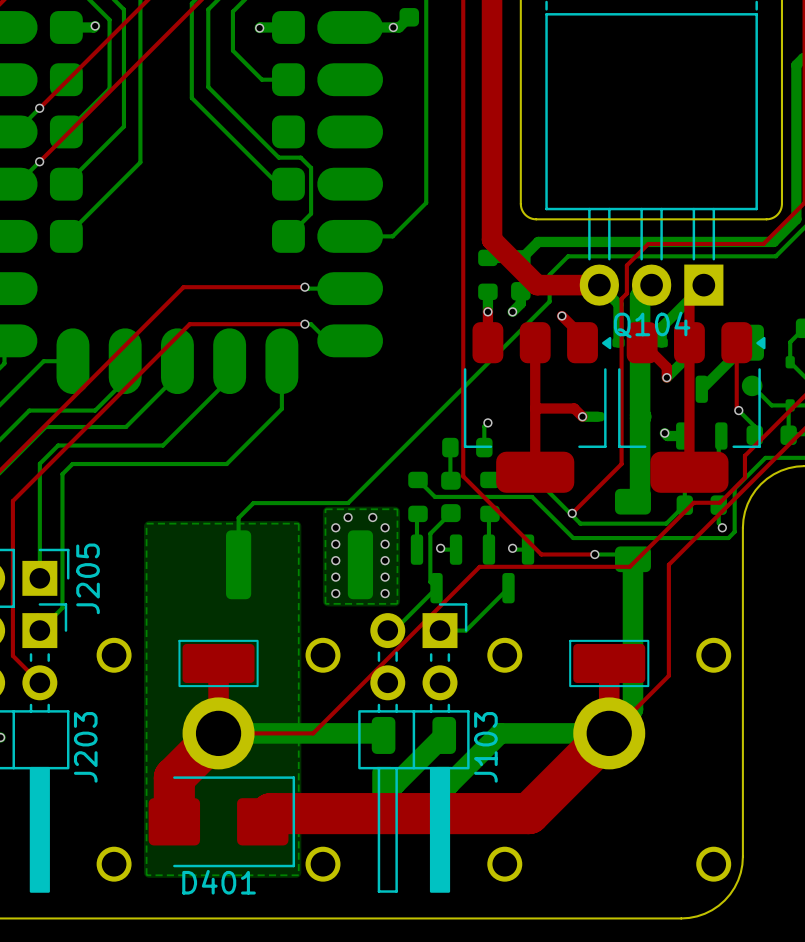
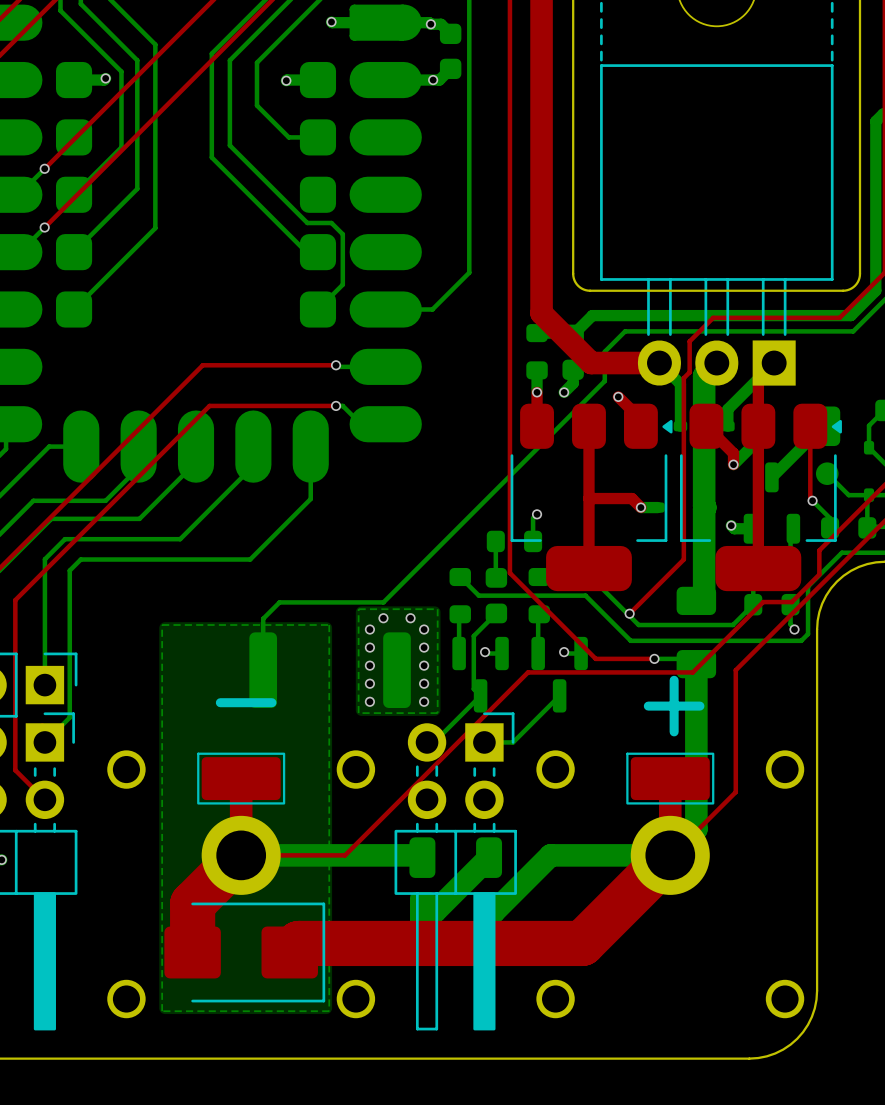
Q104 name: Q104 (652, 324) -> none
J205 name: J205 (88, 578) -> none
text: none -> - (246, 702)
text: none -> + (674, 706)
J203 name: J203 (85, 747) -> none
J103 name: J103 (485, 747) -> none
D401 name: D401 (219, 882) -> none

